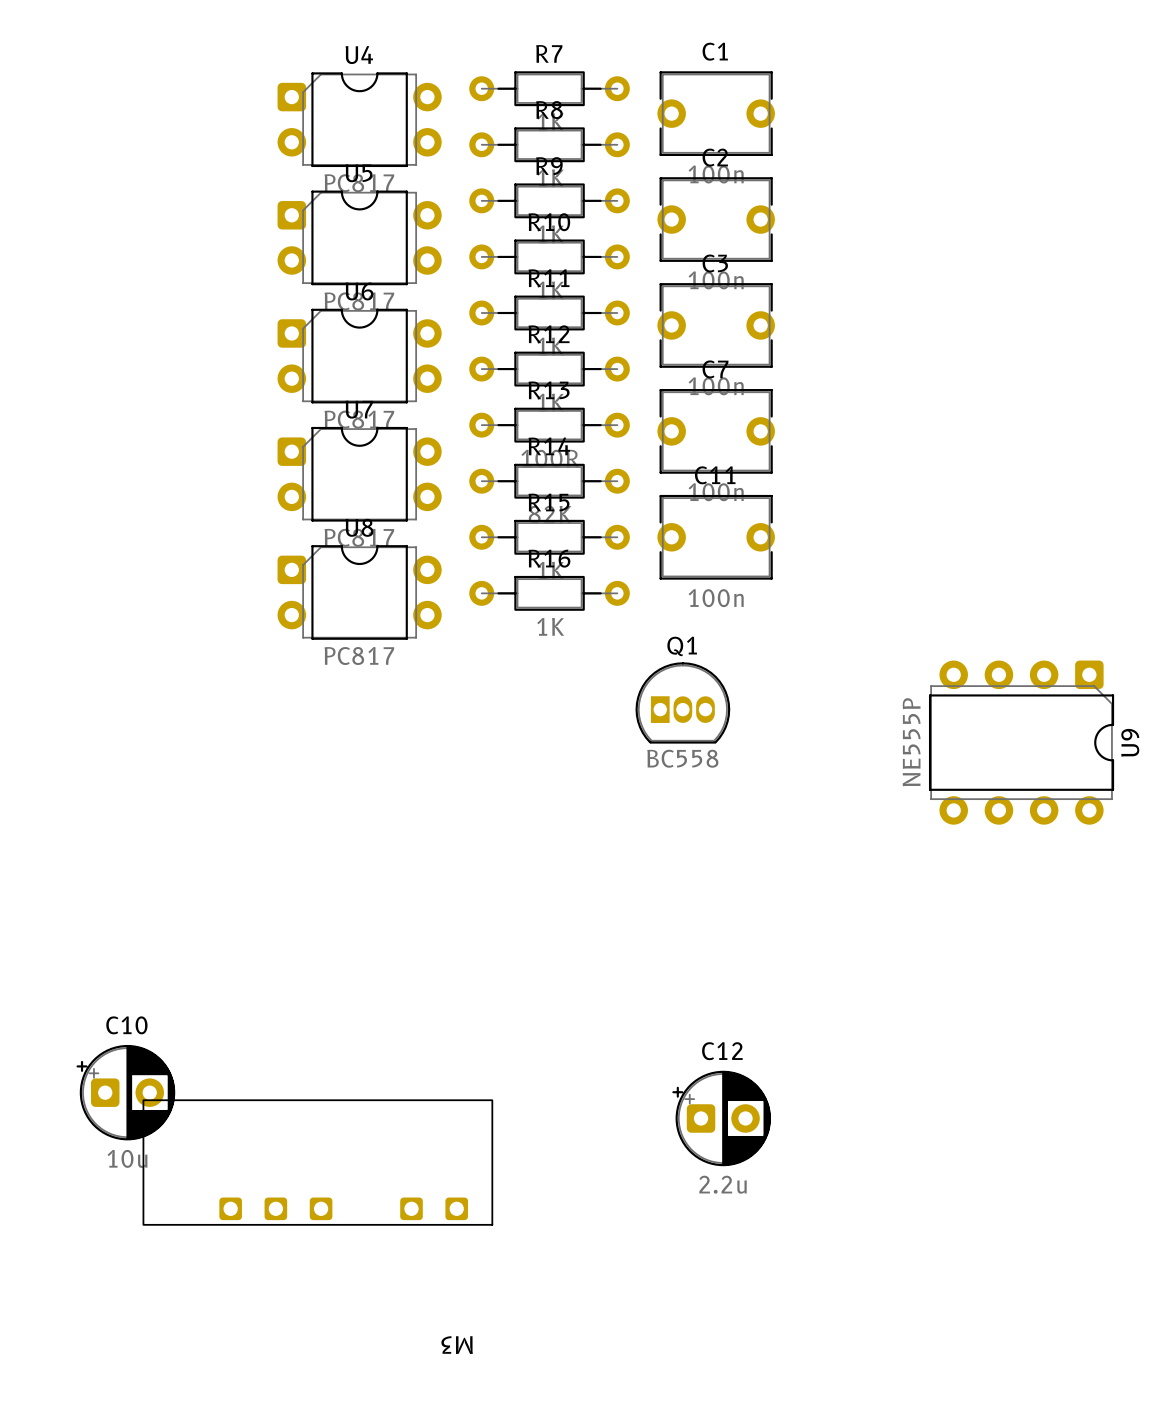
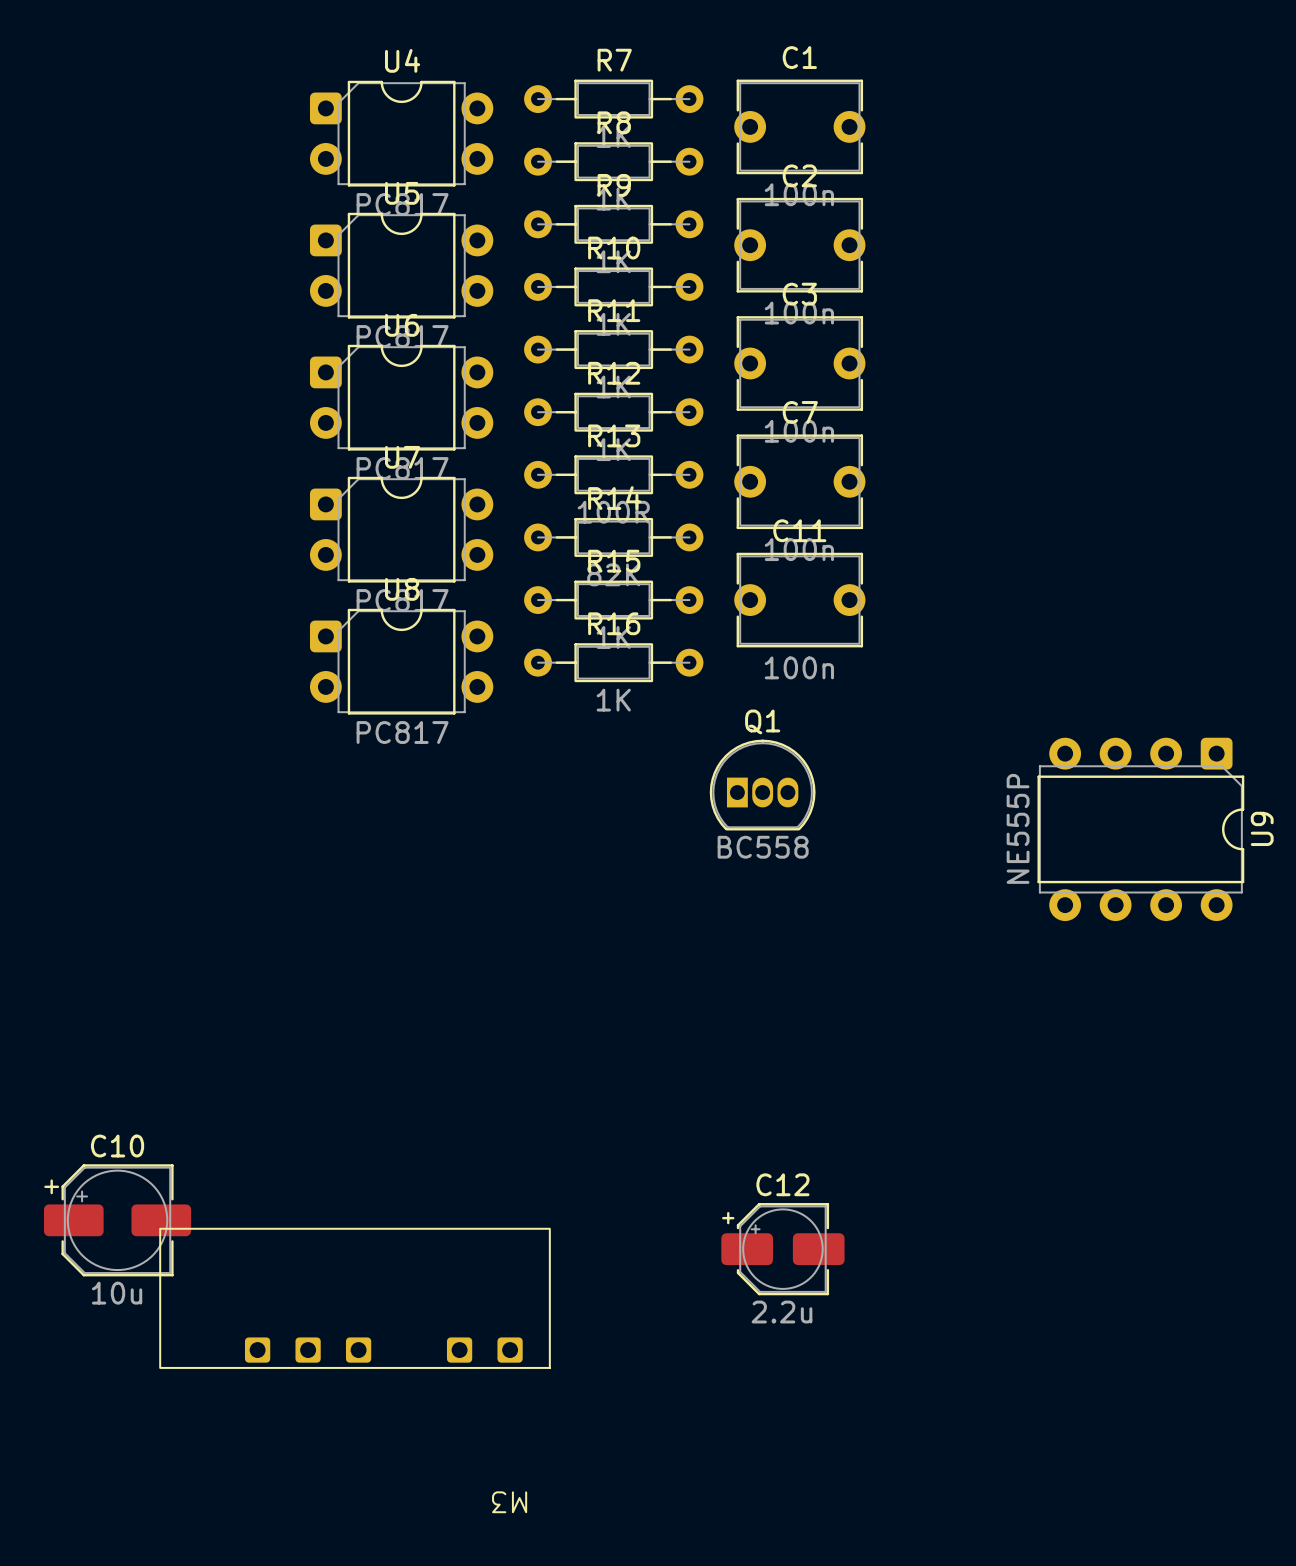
C10 footprint: [76, 1044, 176, 1141] -> [43, 1164, 192, 1277]
C12 footprint: [672, 1070, 771, 1167] -> [721, 1203, 845, 1296]

